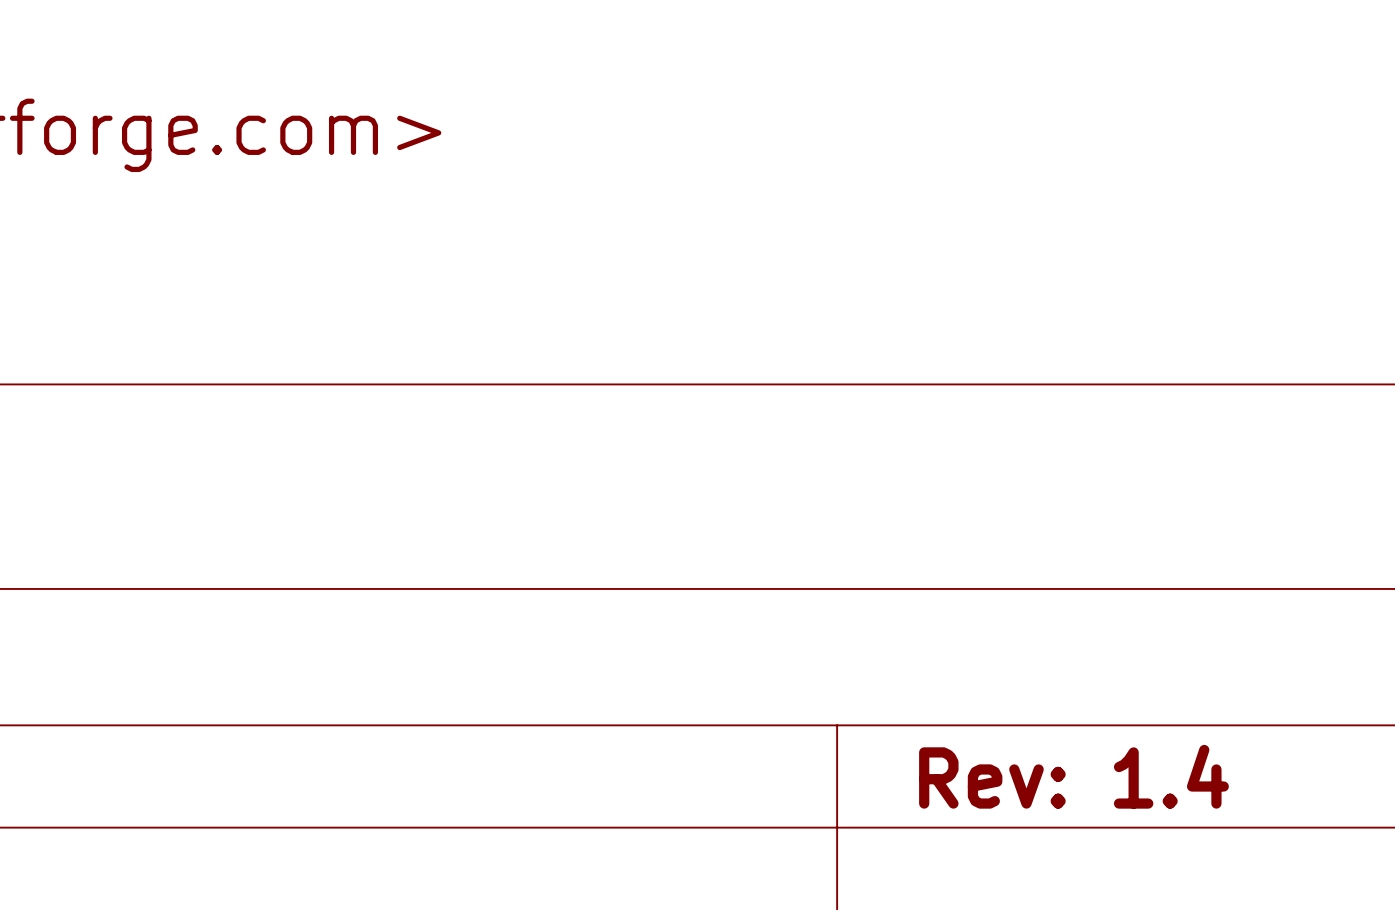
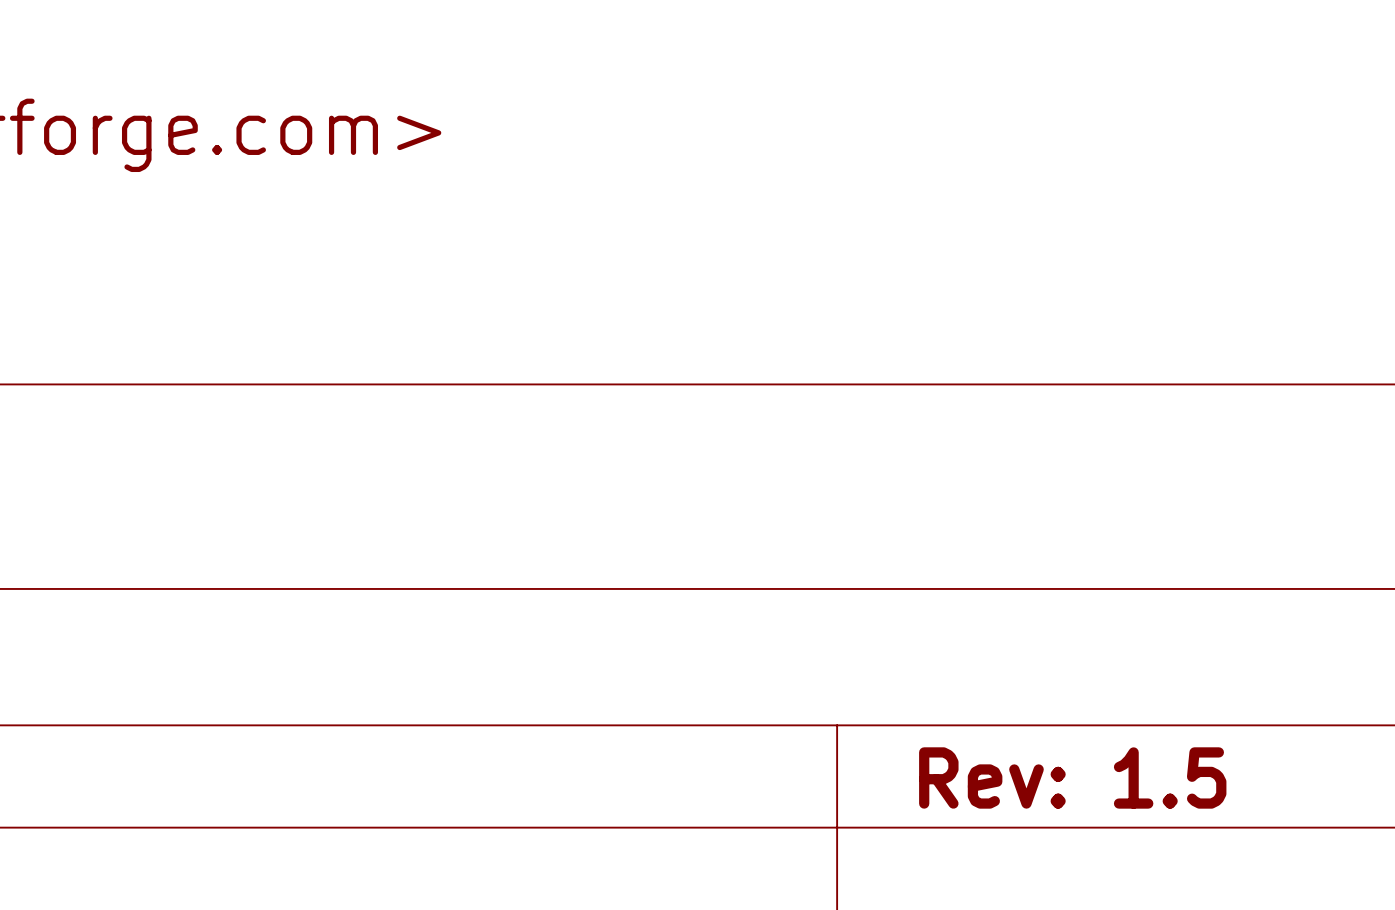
title block: Rev: 1.4 (1073, 776) -> Rev: 1.5 (1072, 777)

